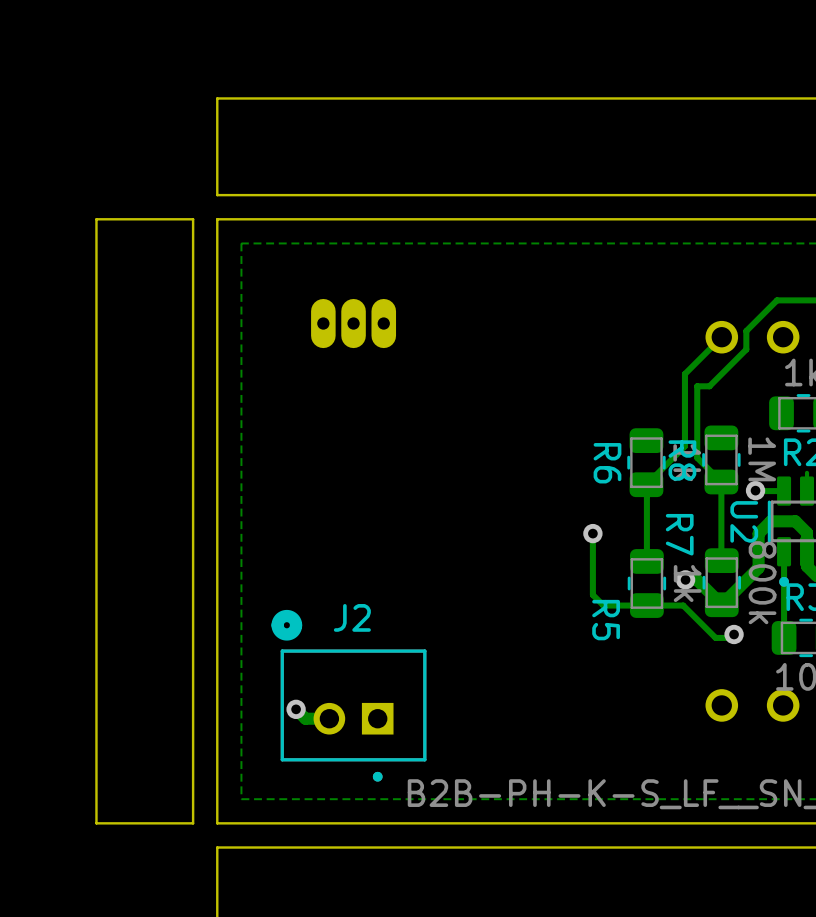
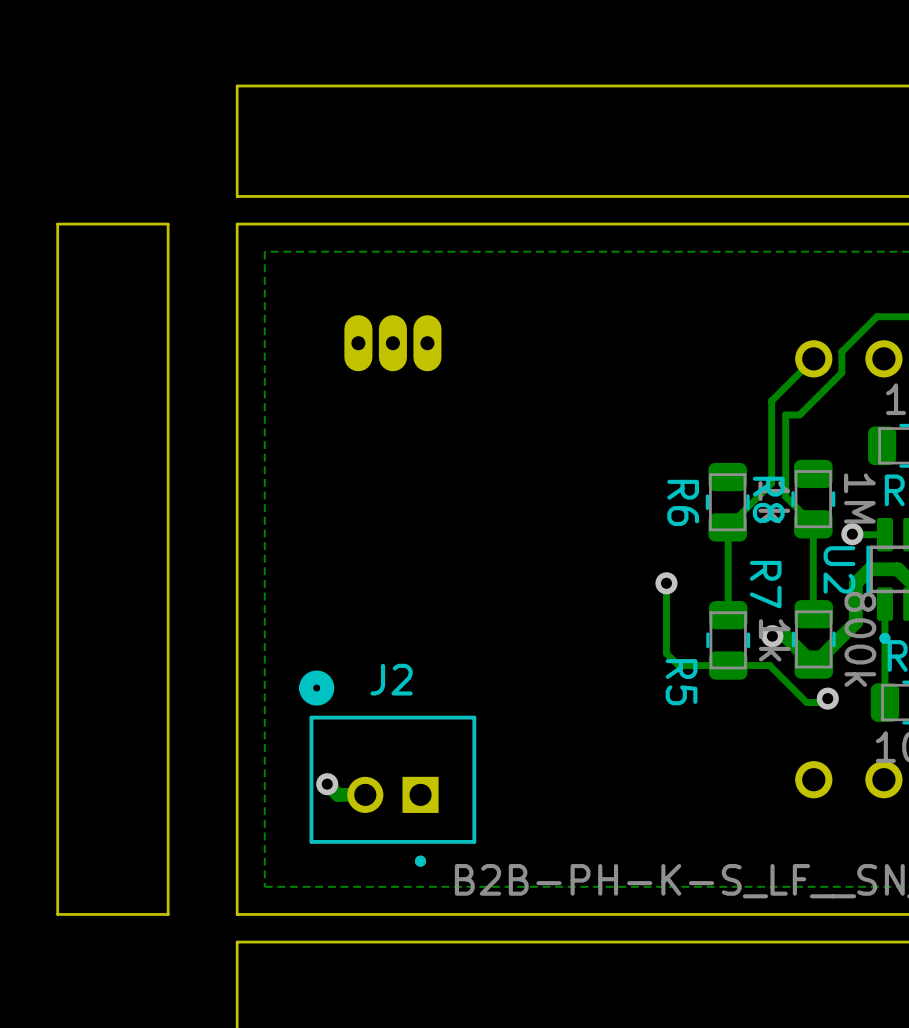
board edge: (96, 219) (96, 823) -> (99, 224) (57, 224) (57, 914) (99, 914)
board edge: (156, 219) (193, 219) (193, 823) (156, 823) -> (168, 224) (168, 914)

